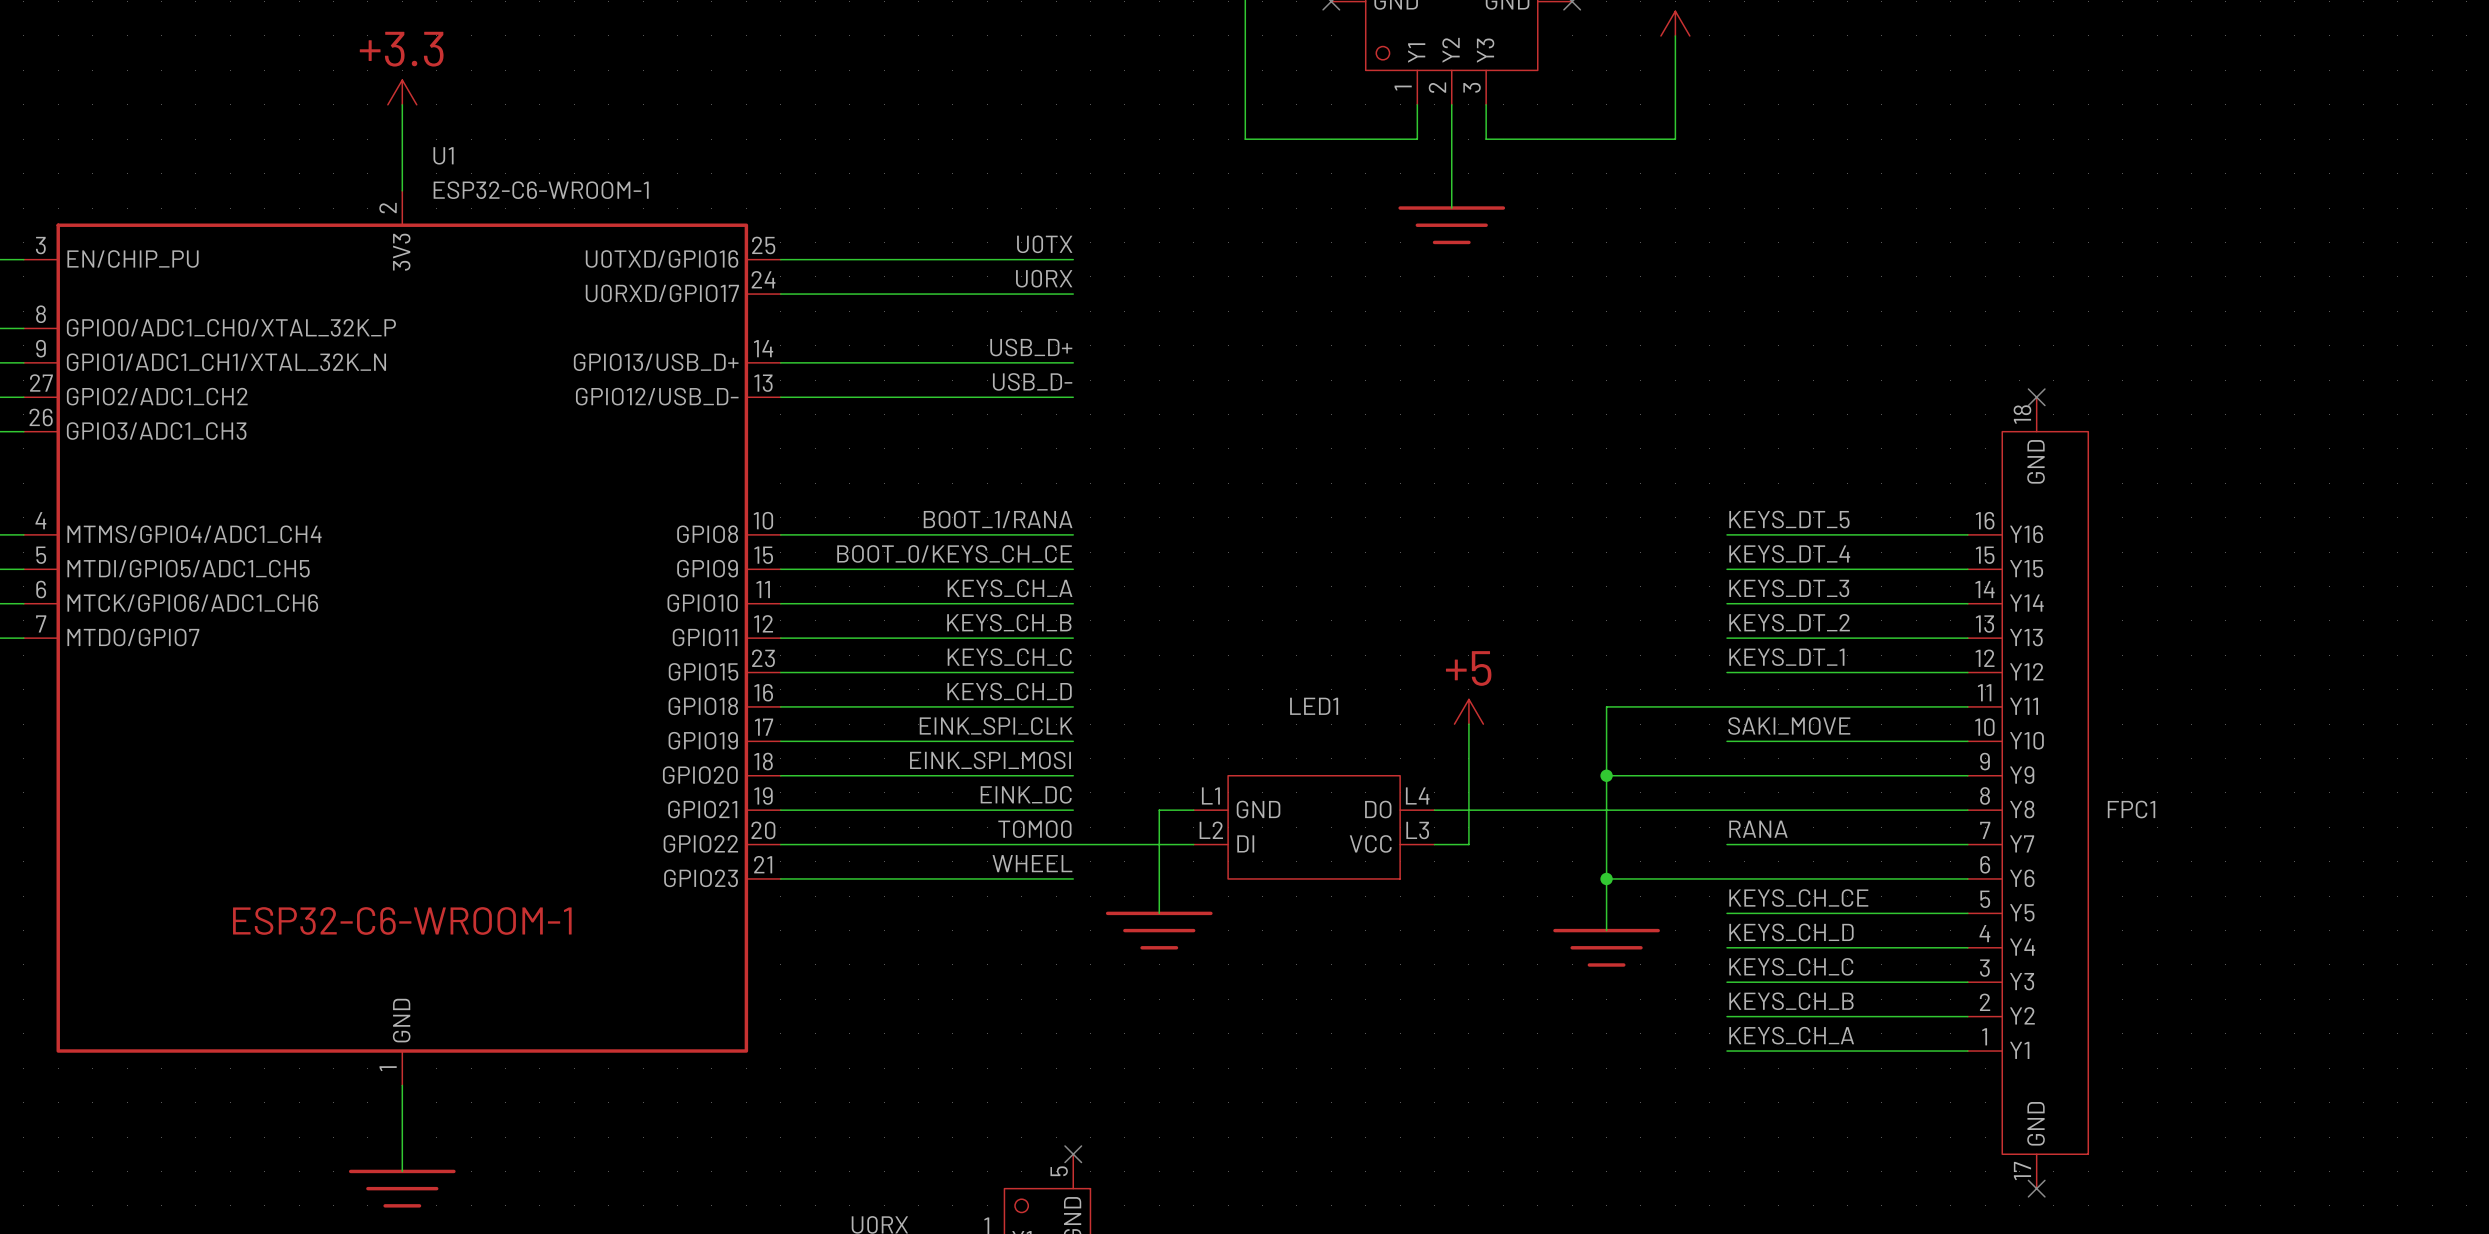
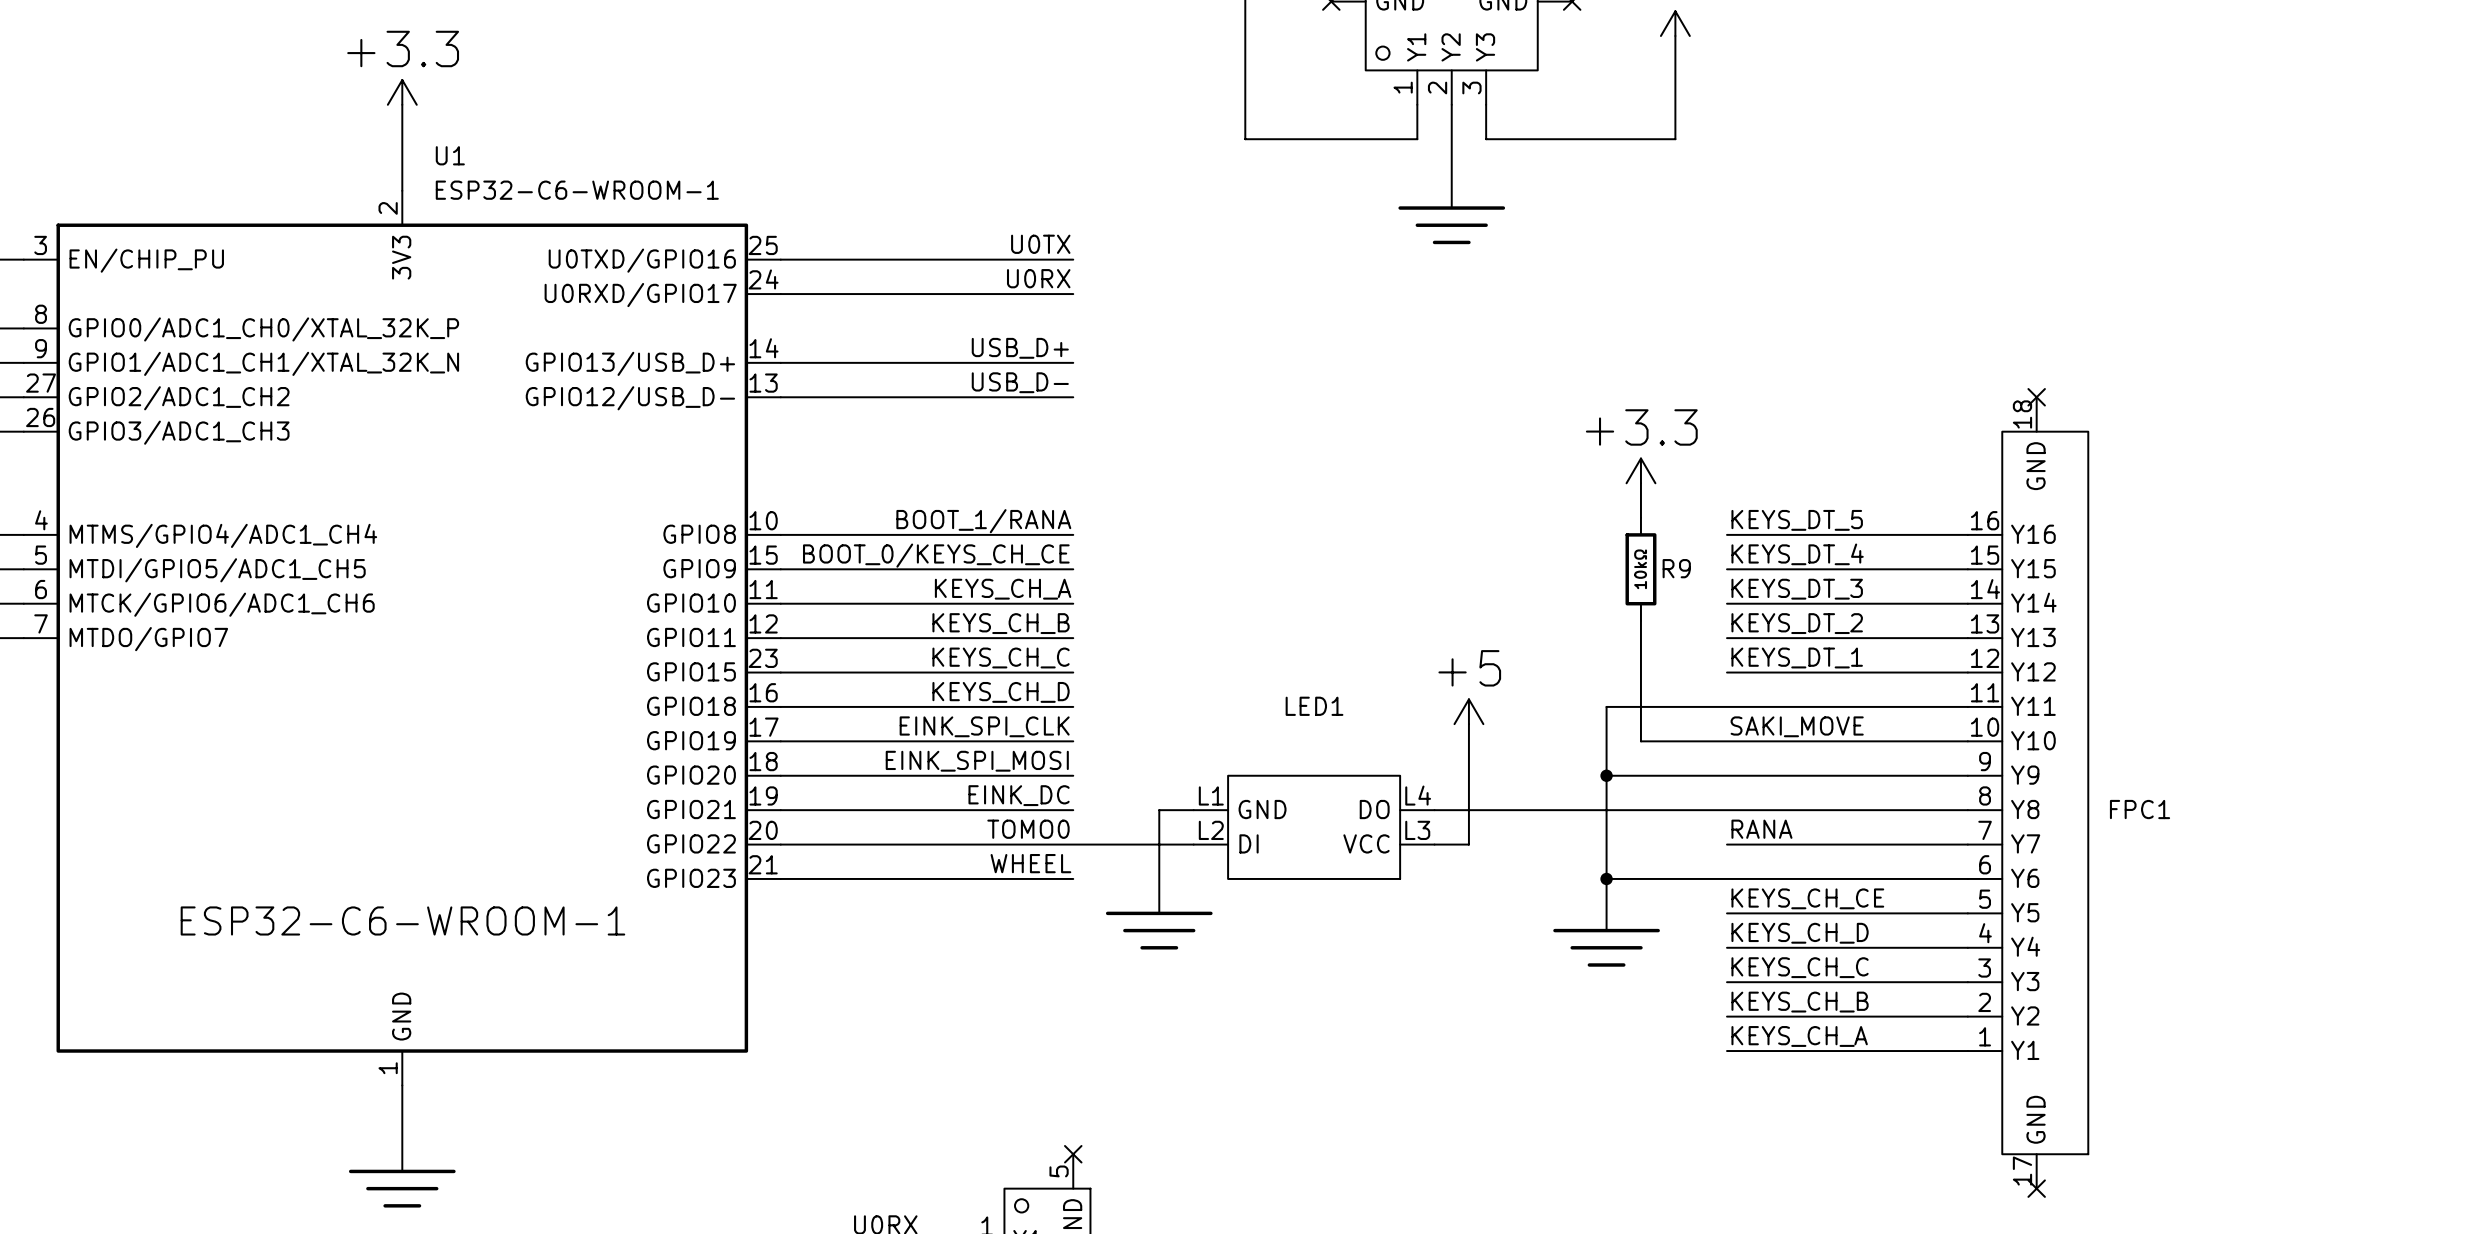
power symbol: none -> (1640, 470)
wire: none -> (1640, 483) (1640, 517)
R9: none -> 10kΩ (1640, 569)
wire: none -> (1640, 620) (1640, 741) (1727, 741)

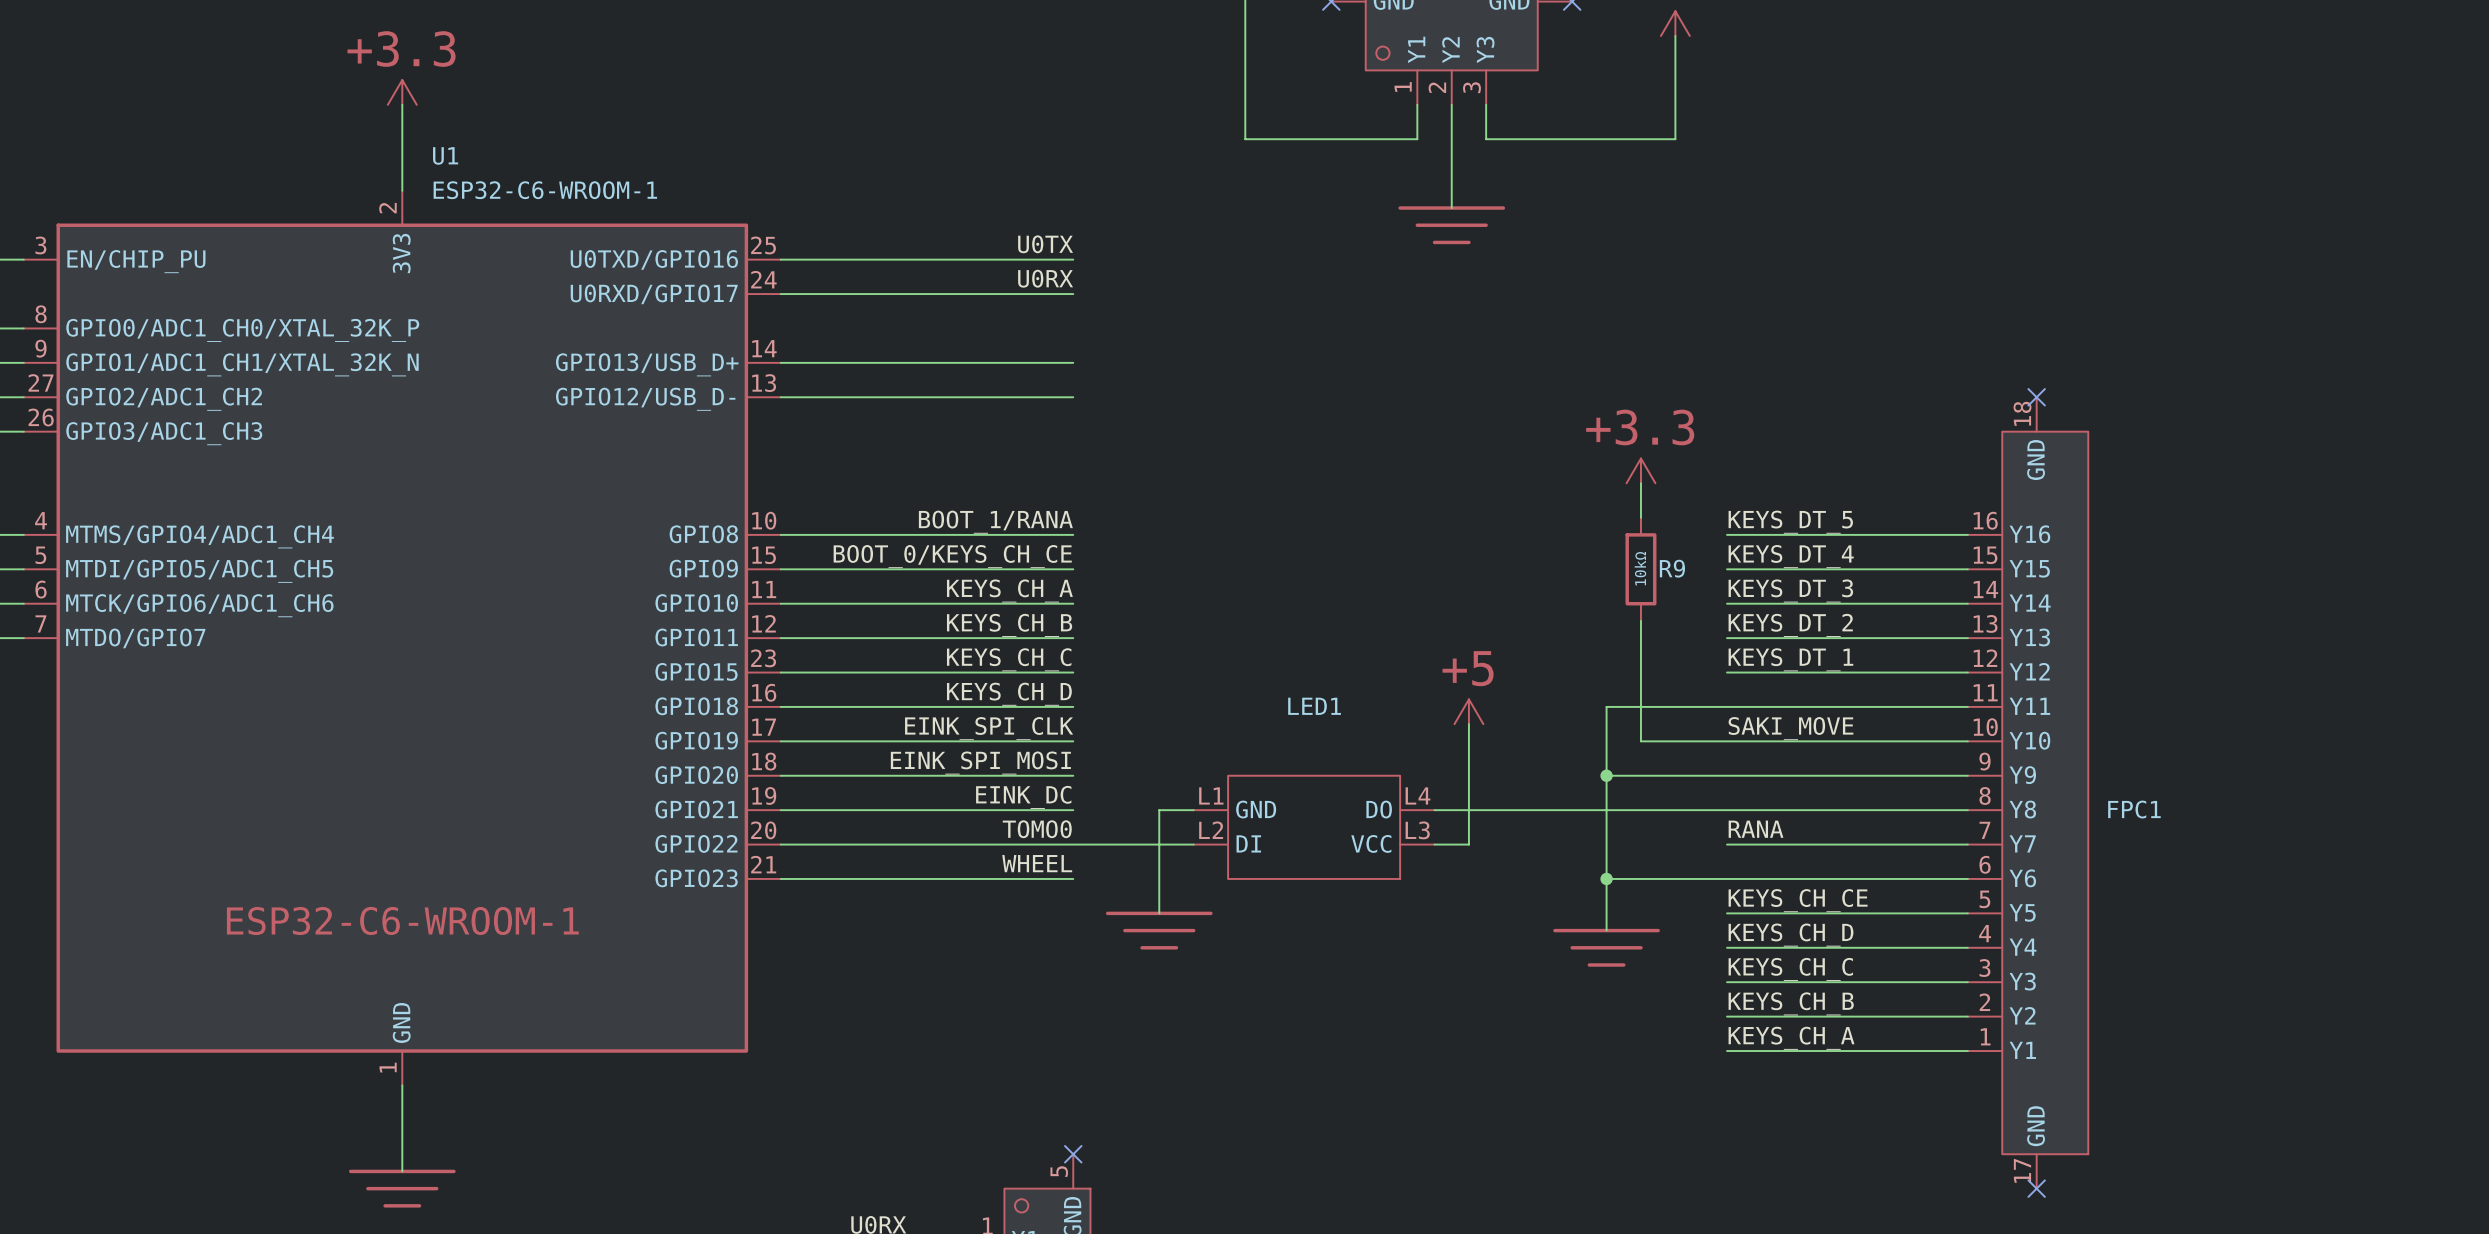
label: USB_D+ (1020, 348) -> none
label: USB_D- (1020, 382) -> none

